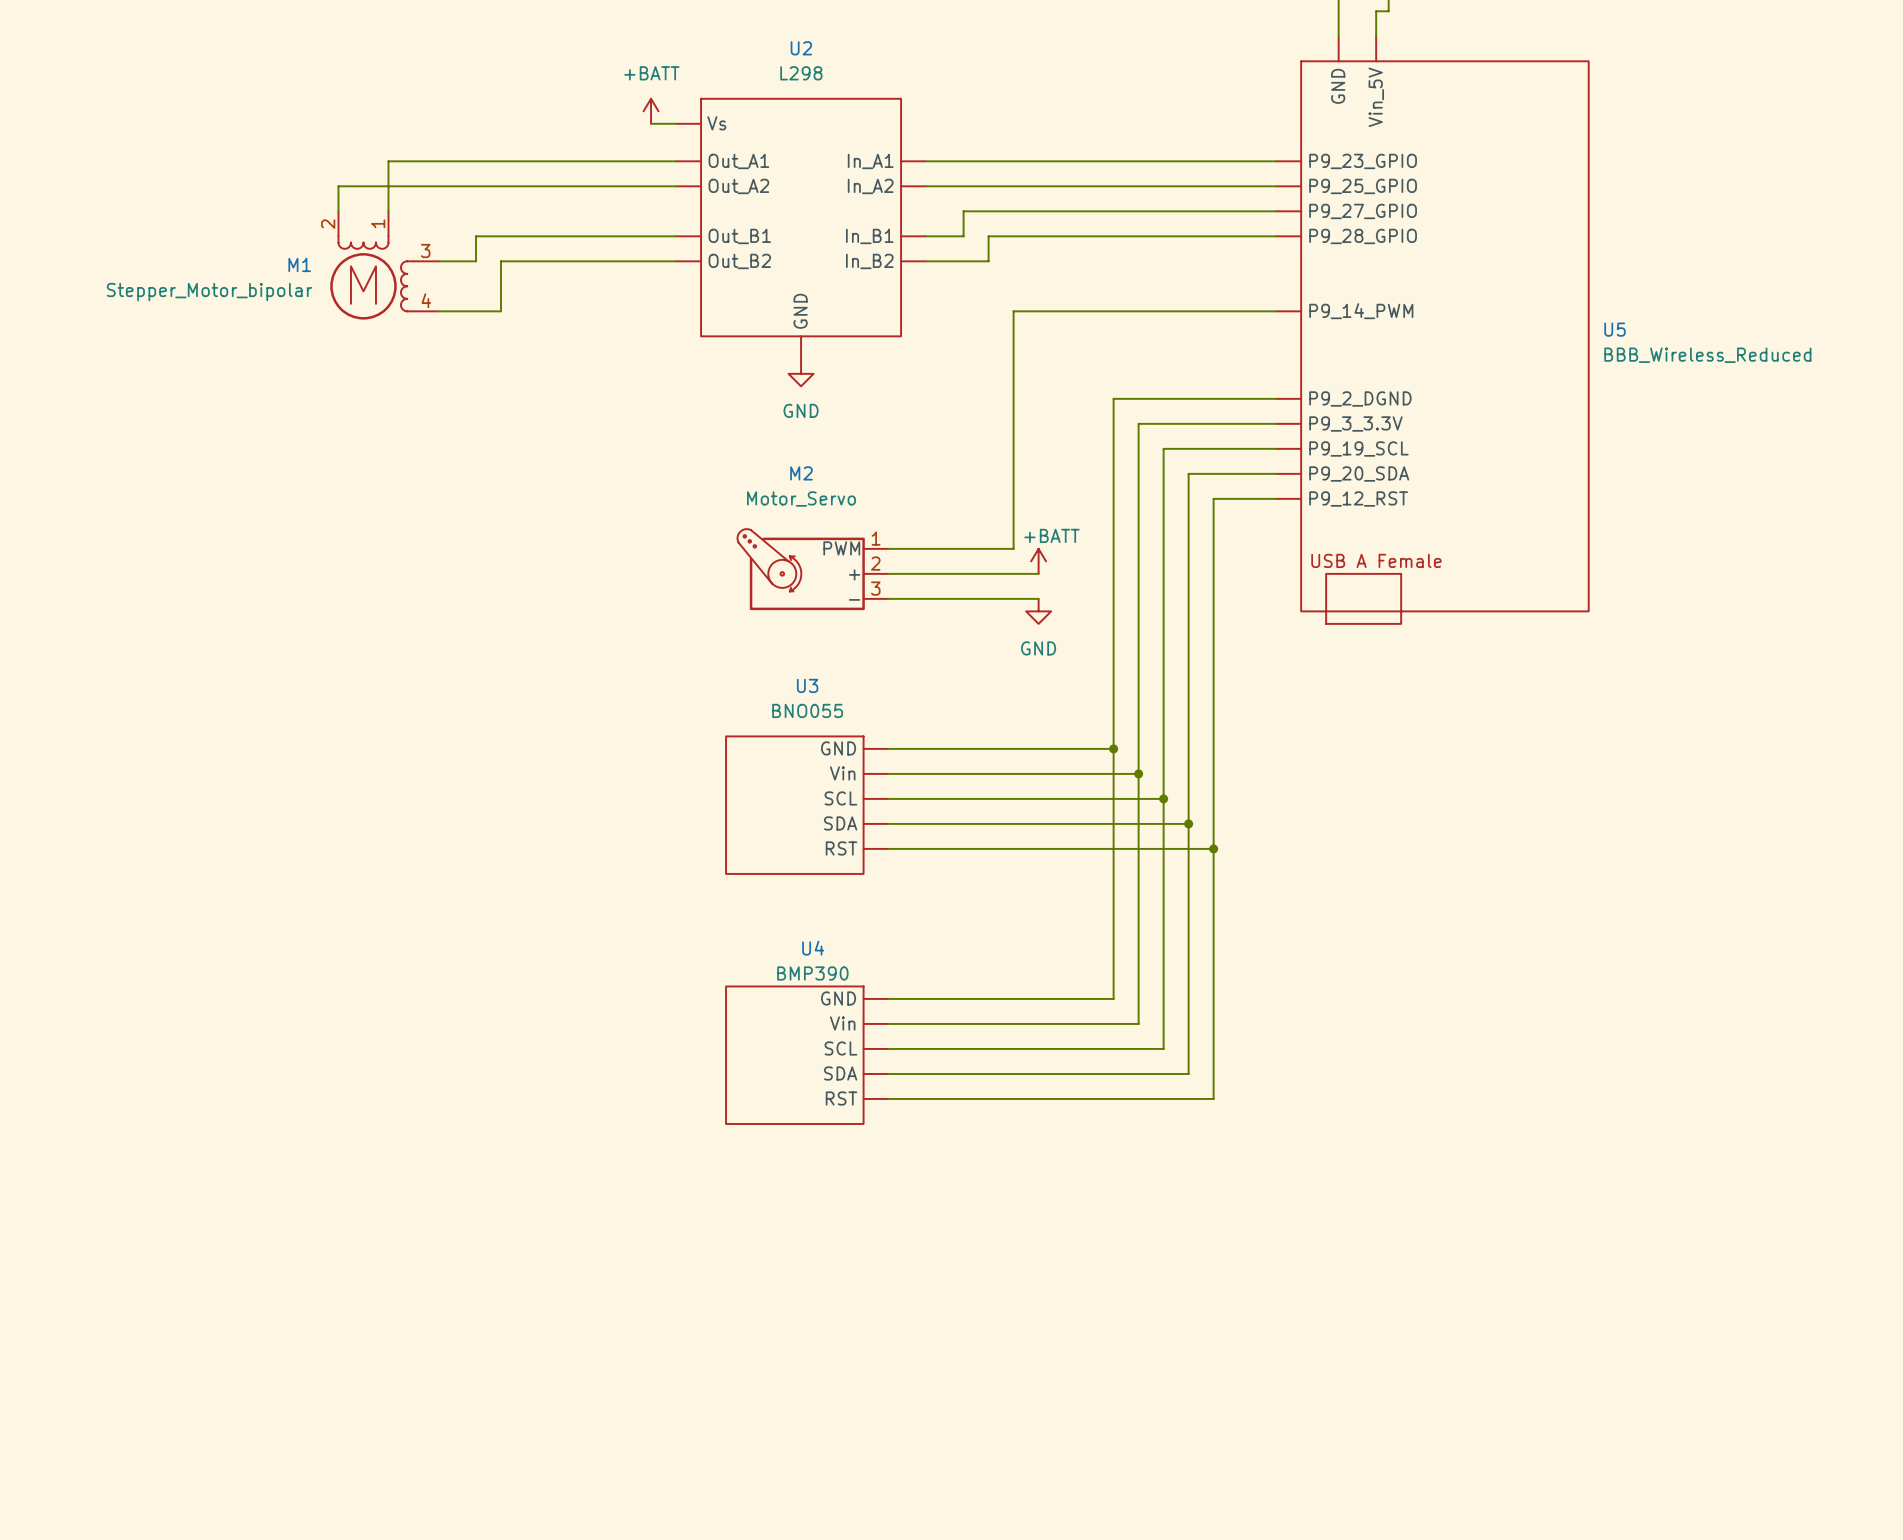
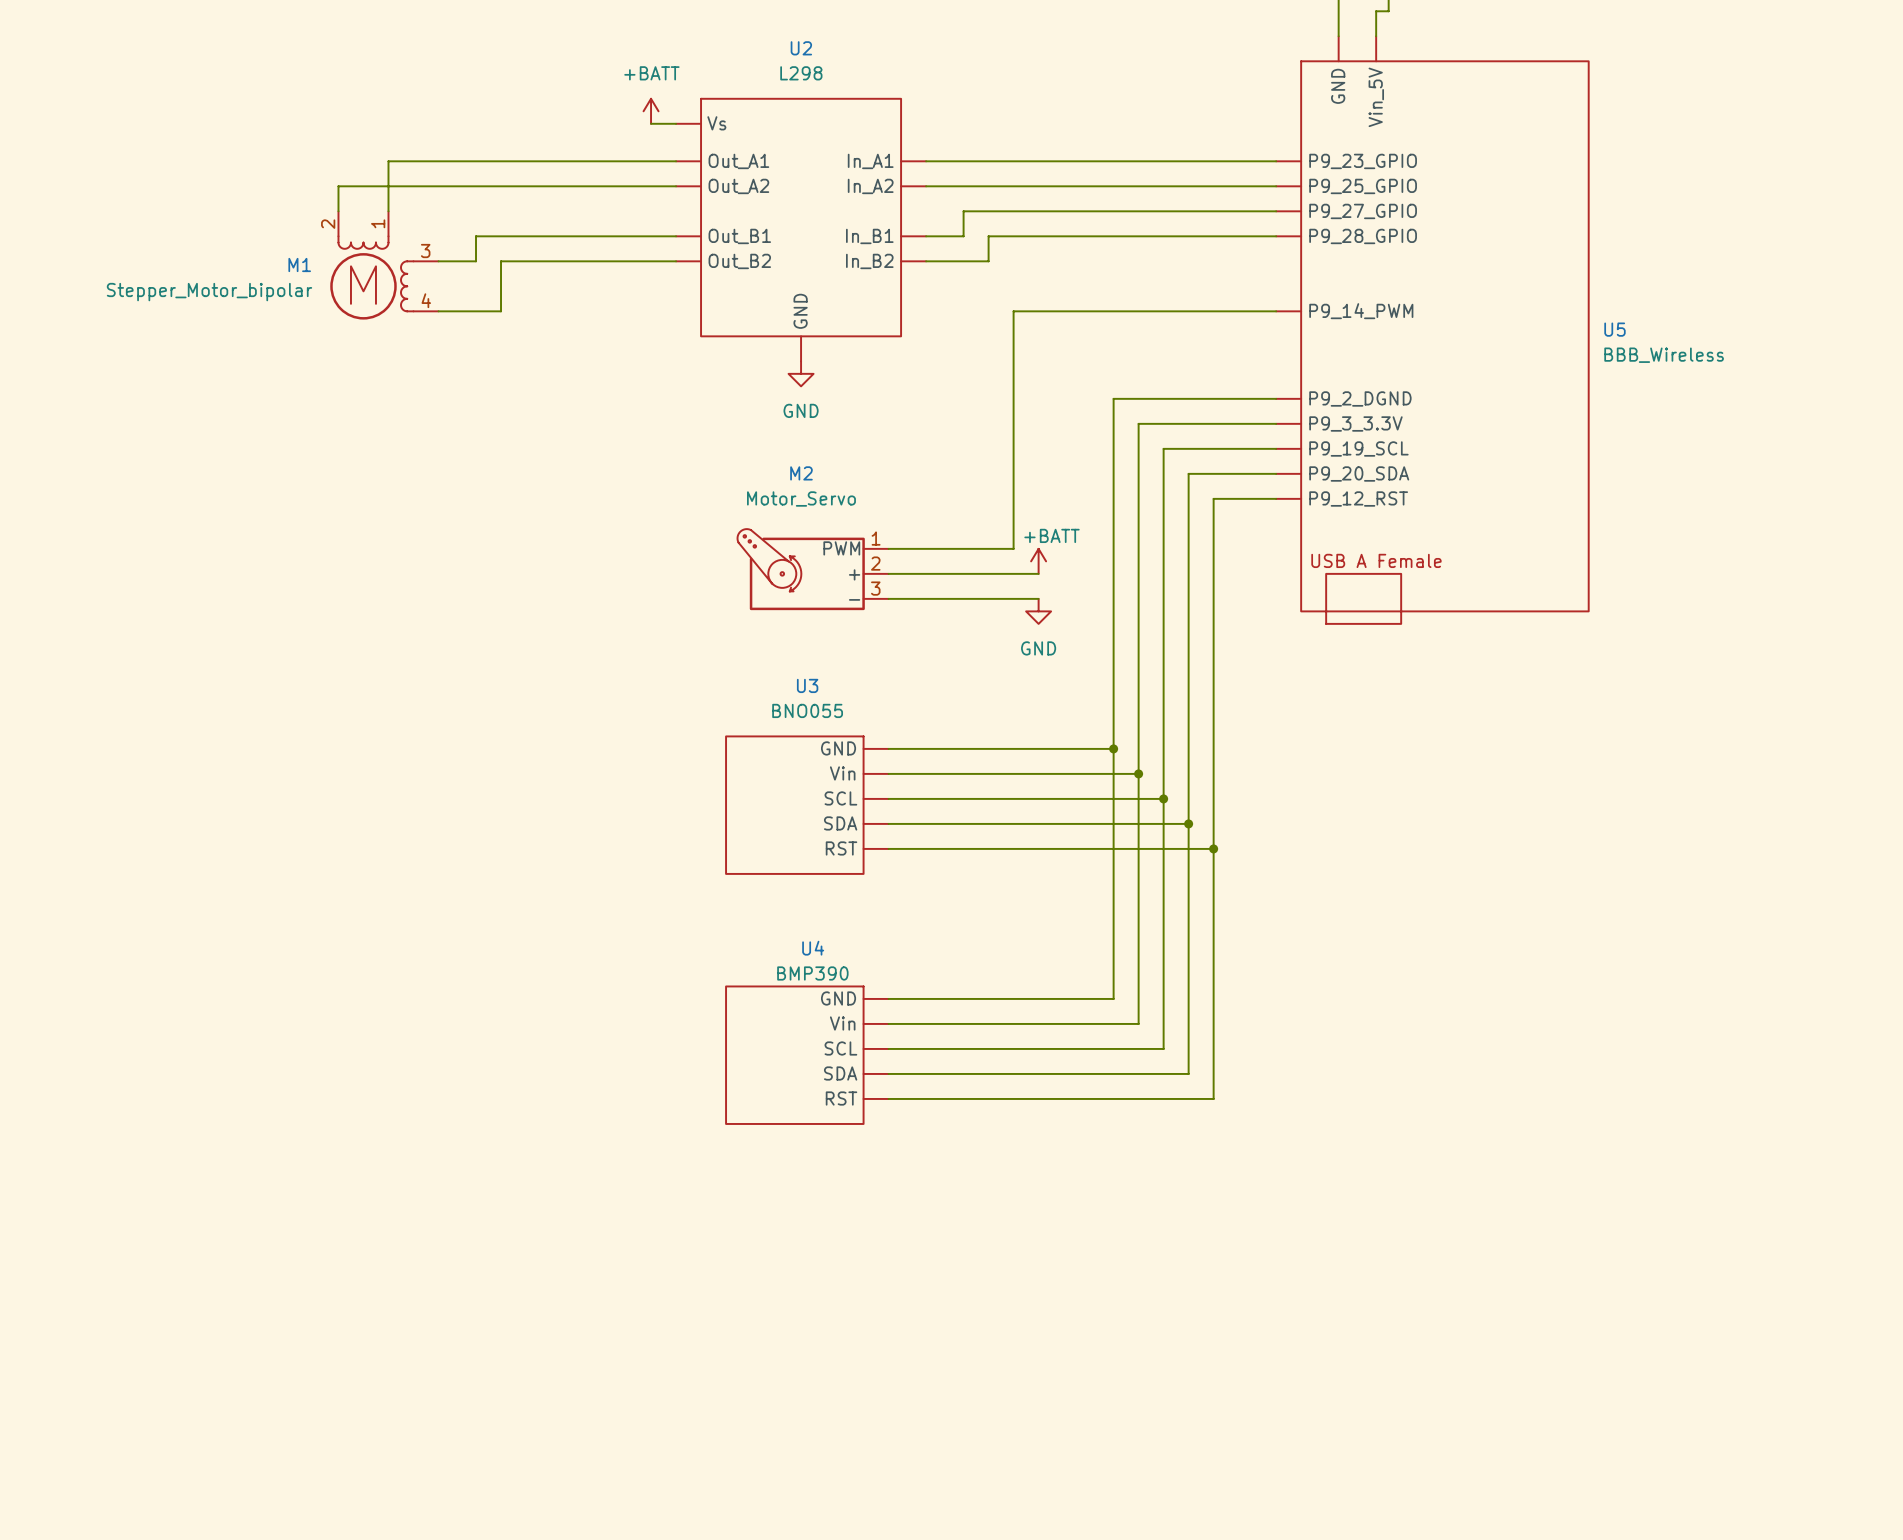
U5 value: BBB_Wireless_Reduced (1707, 355) -> BBB_Wireless (1664, 355)

